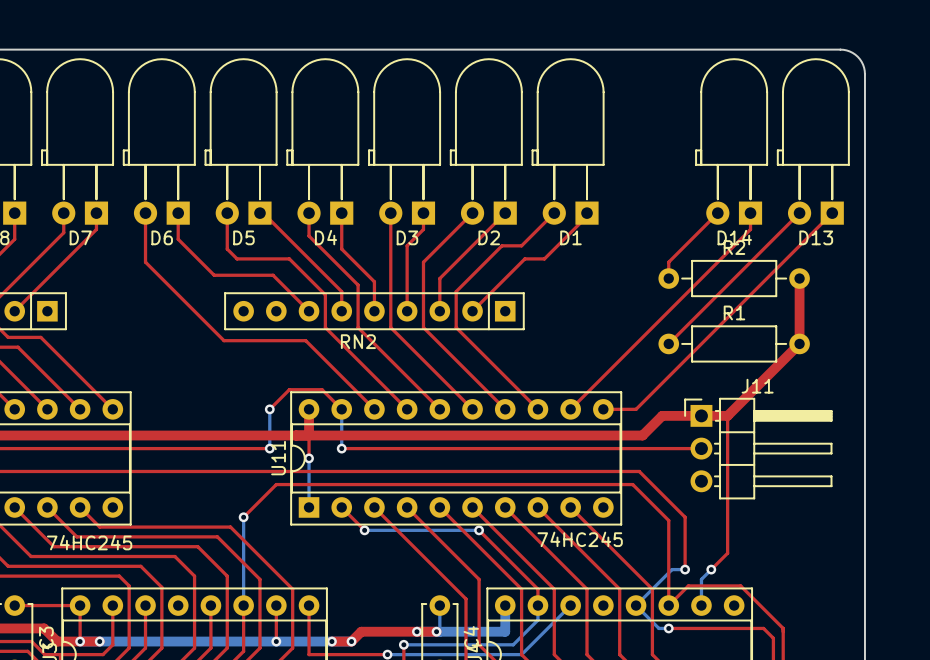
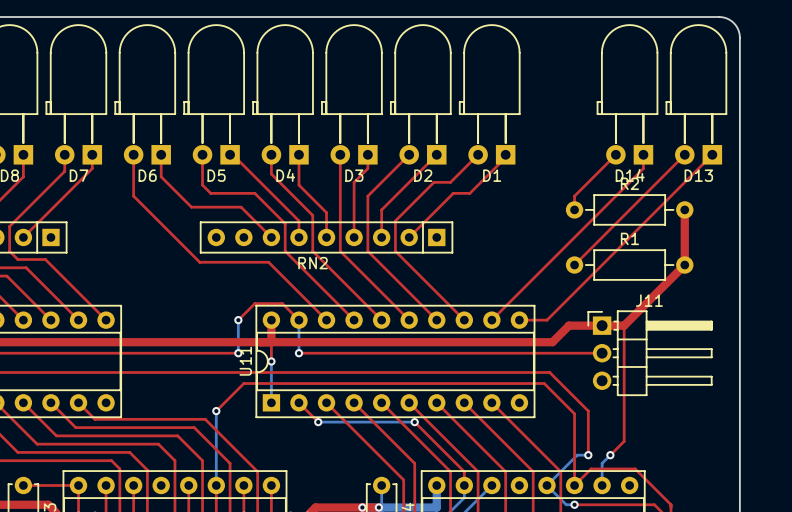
U11 value: 74HC245 (580, 539) -> none
part value: 74HC245 (89, 542) -> none

